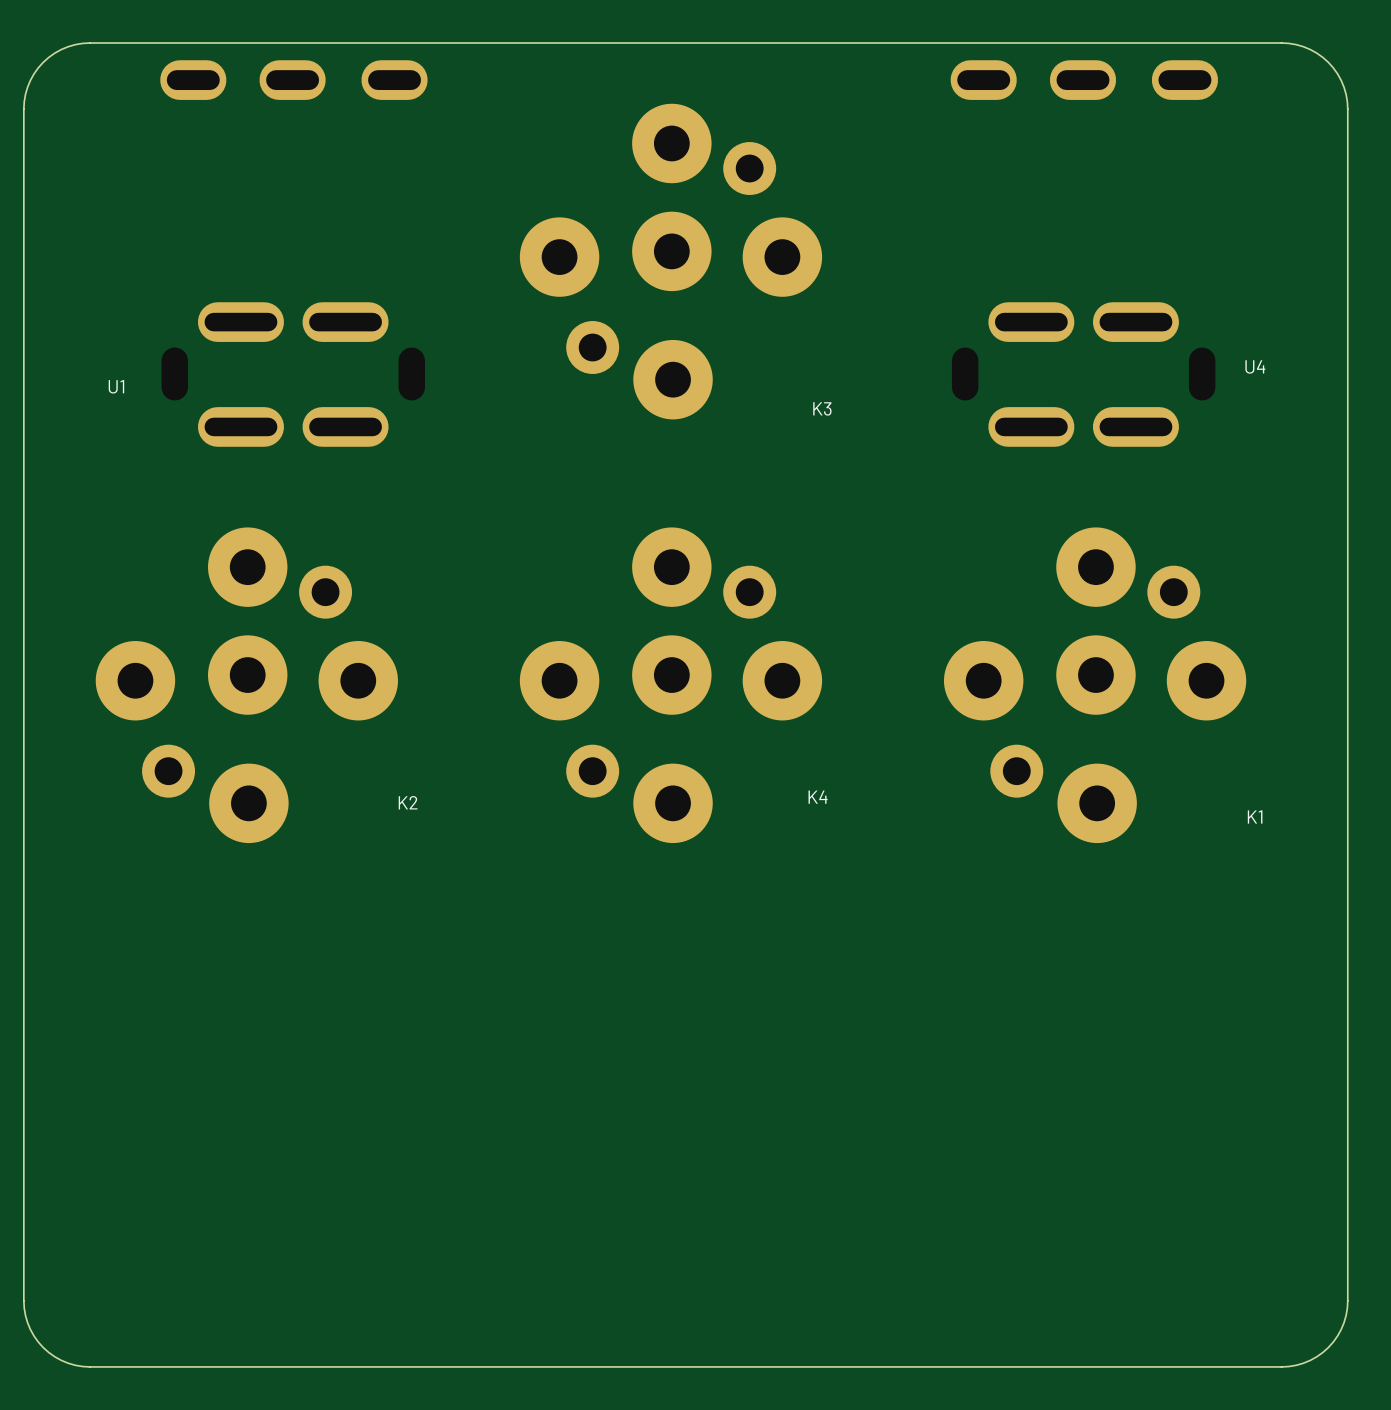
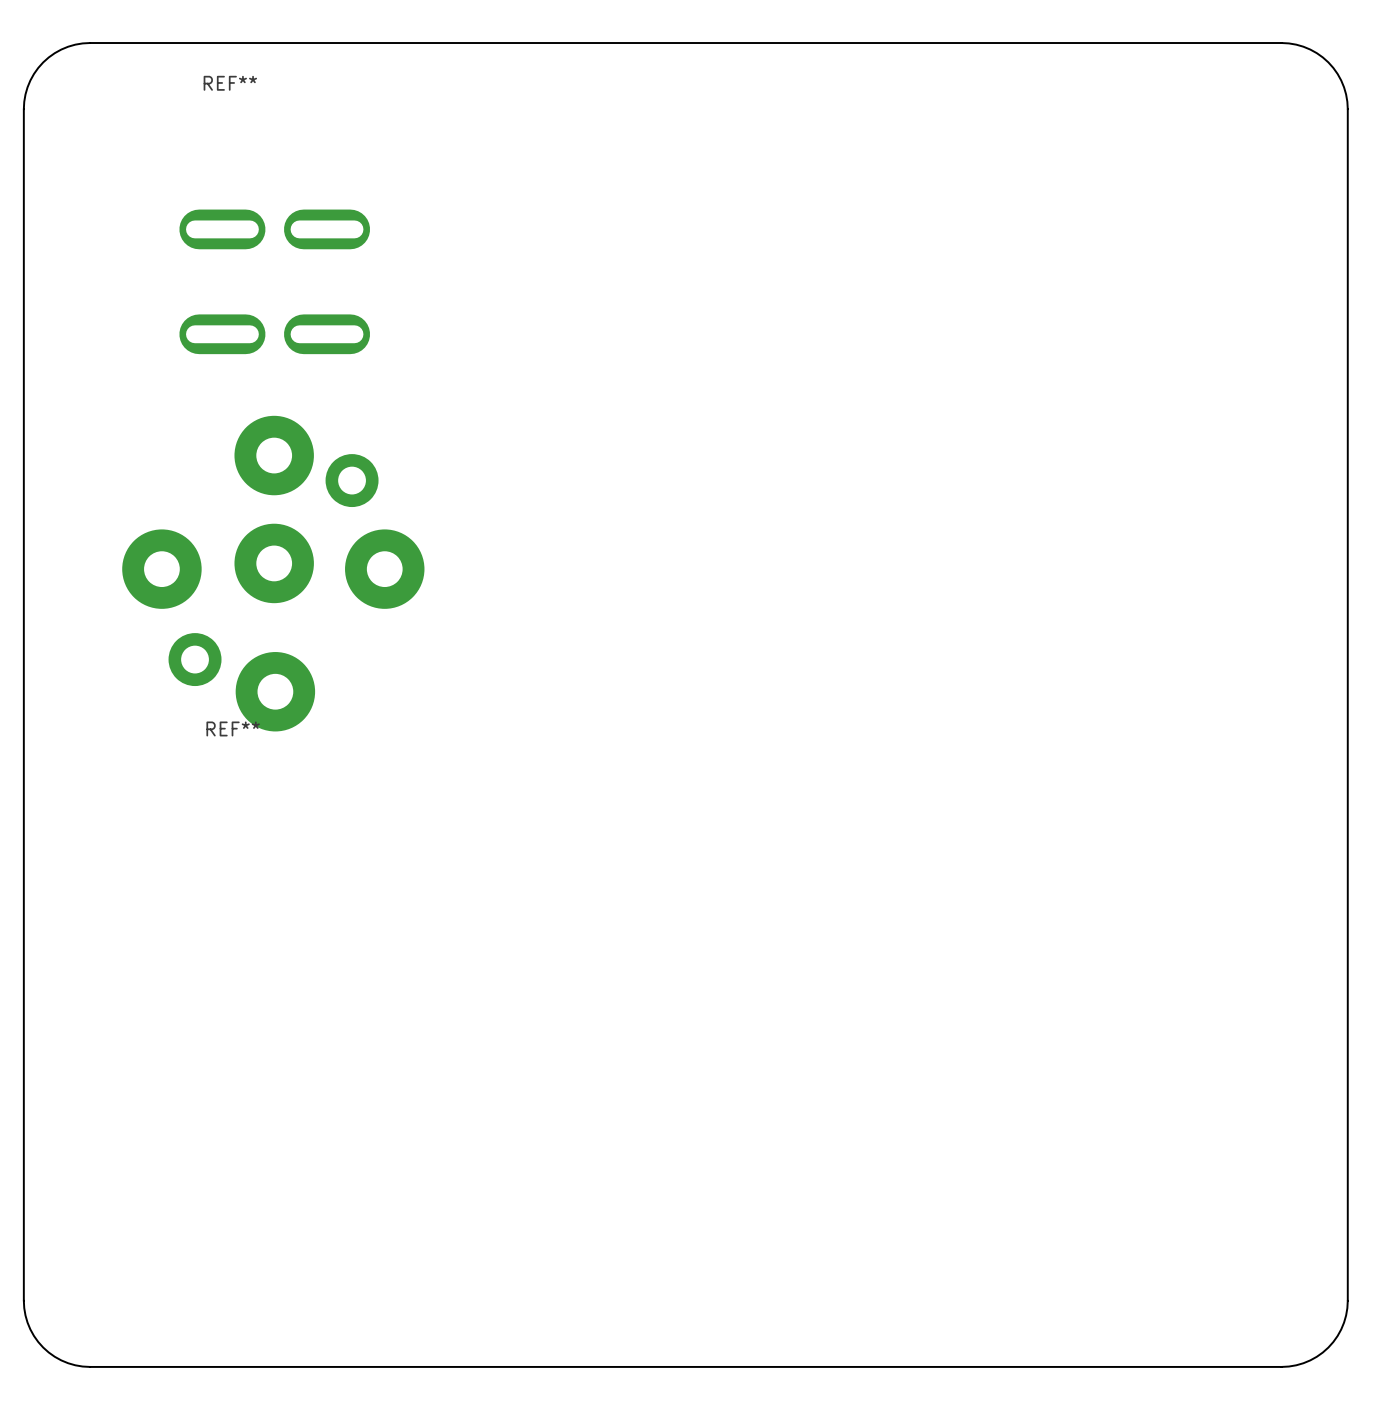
U1: (293, 253) -> none
U4: (1084, 253) -> none
K3: (670, 261) -> none
REF**: none -> (274, 281)
REF**: none -> (273, 573)
K2: (246, 685) -> none
K4: (670, 685) -> none
K1: (1095, 685) -> none

